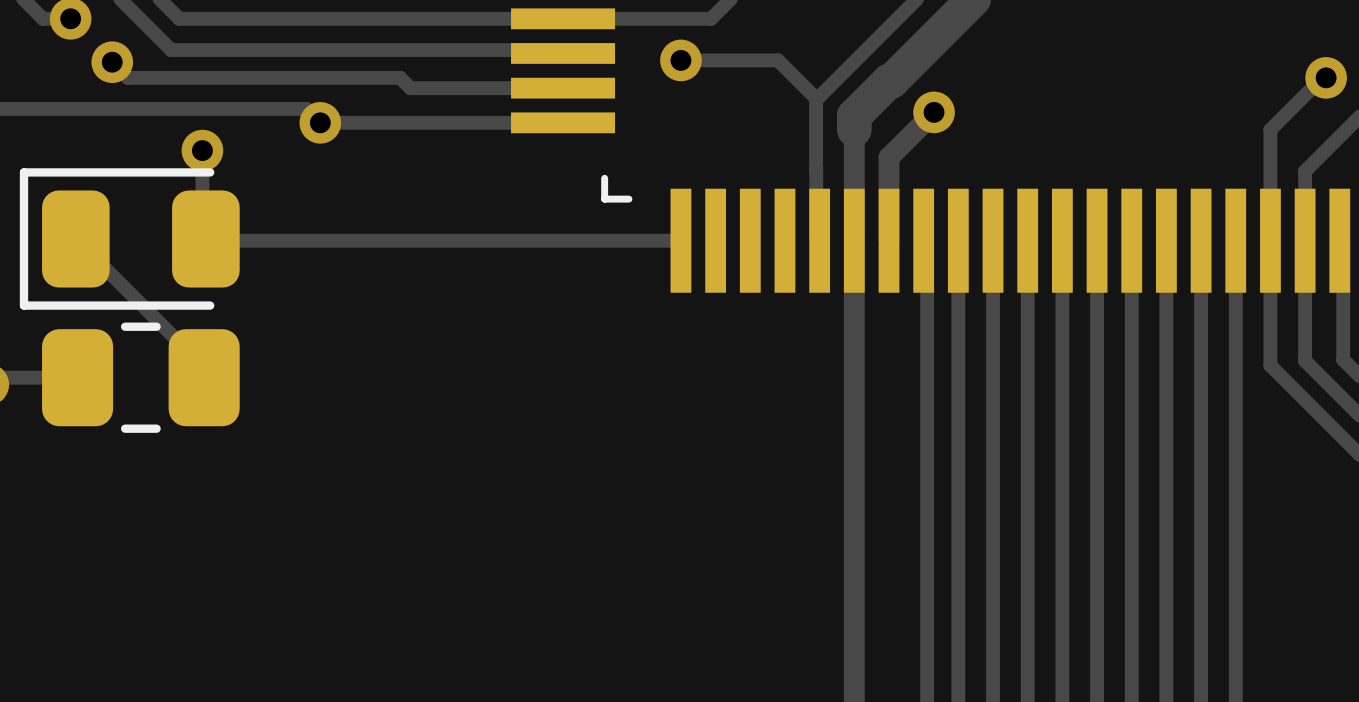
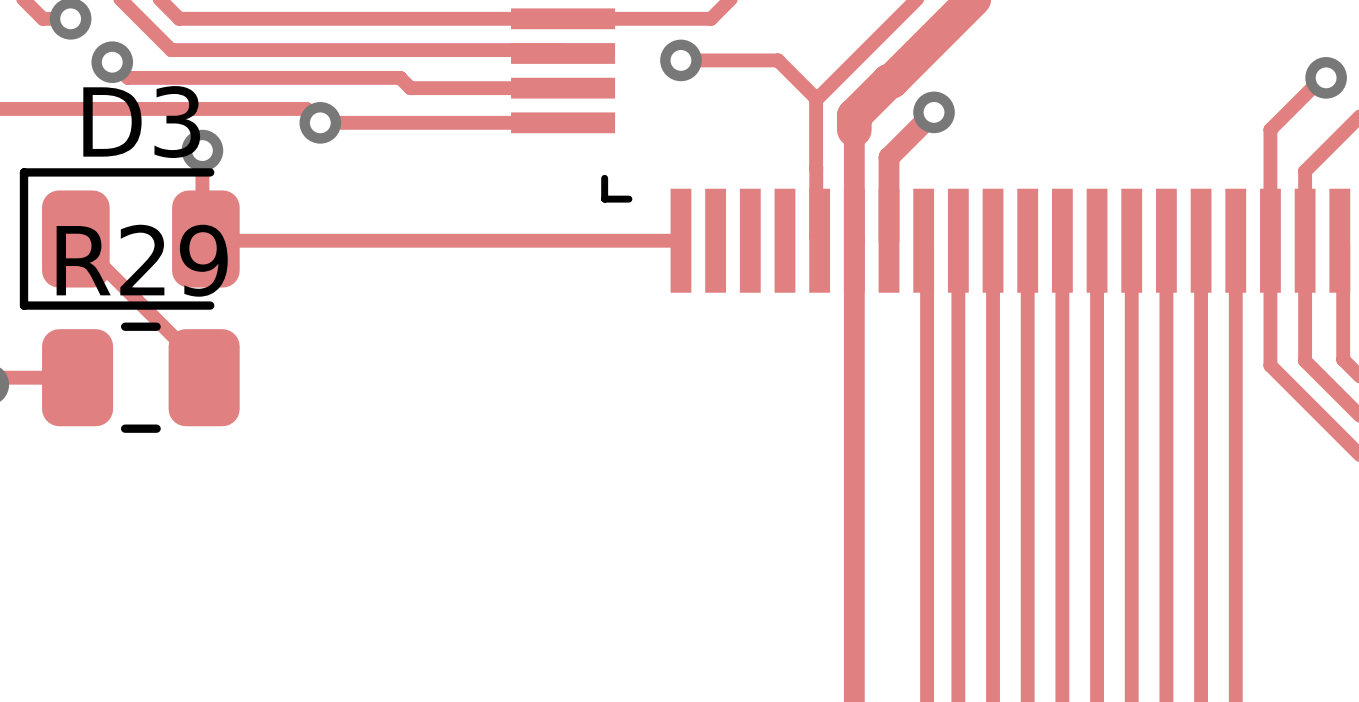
D3 name: none -> D3 (141, 122)
R29 name: none -> R29 (142, 260)

